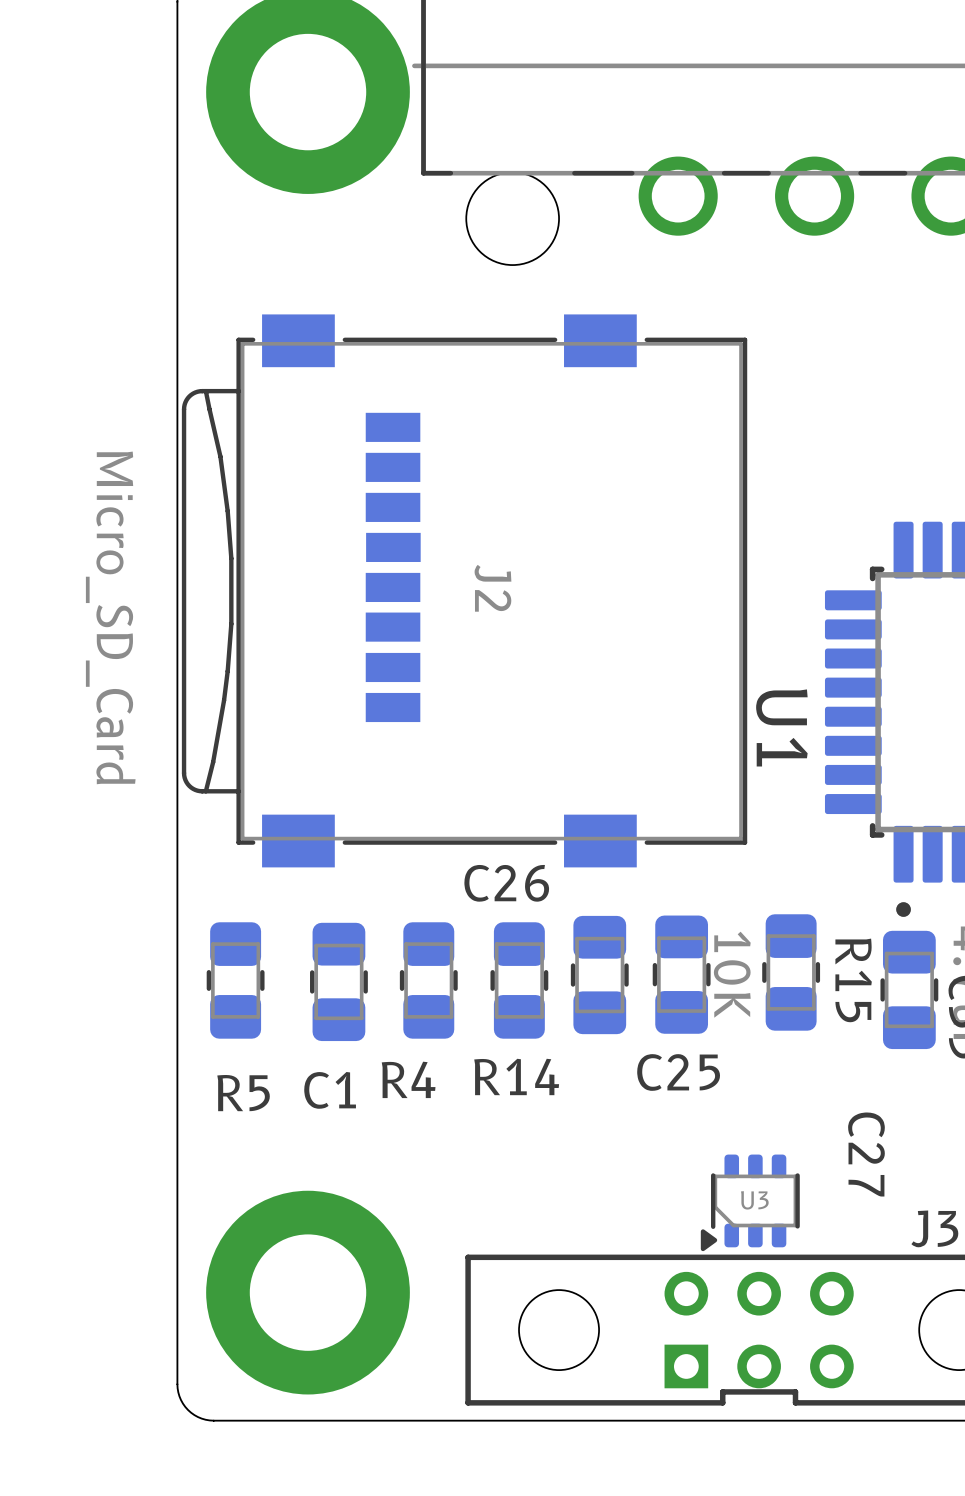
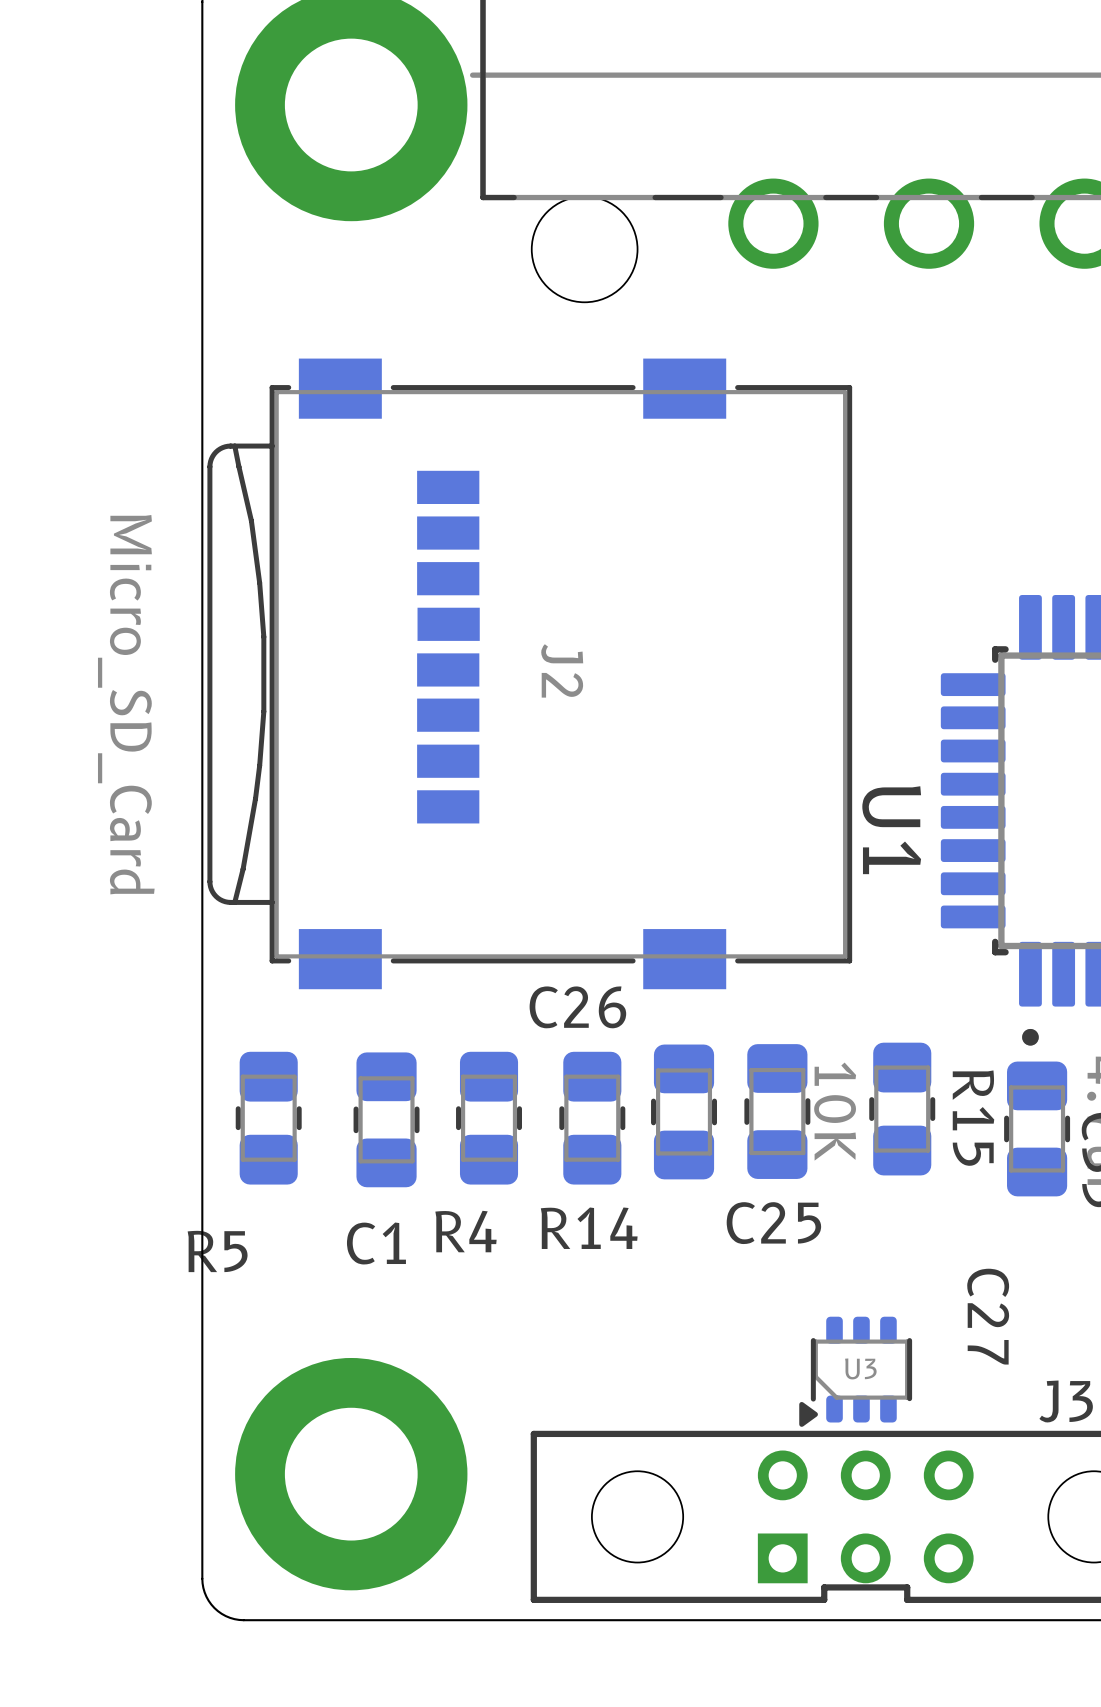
R5 name position: R5 (243, 1093) -> R5 (217, 1251)

